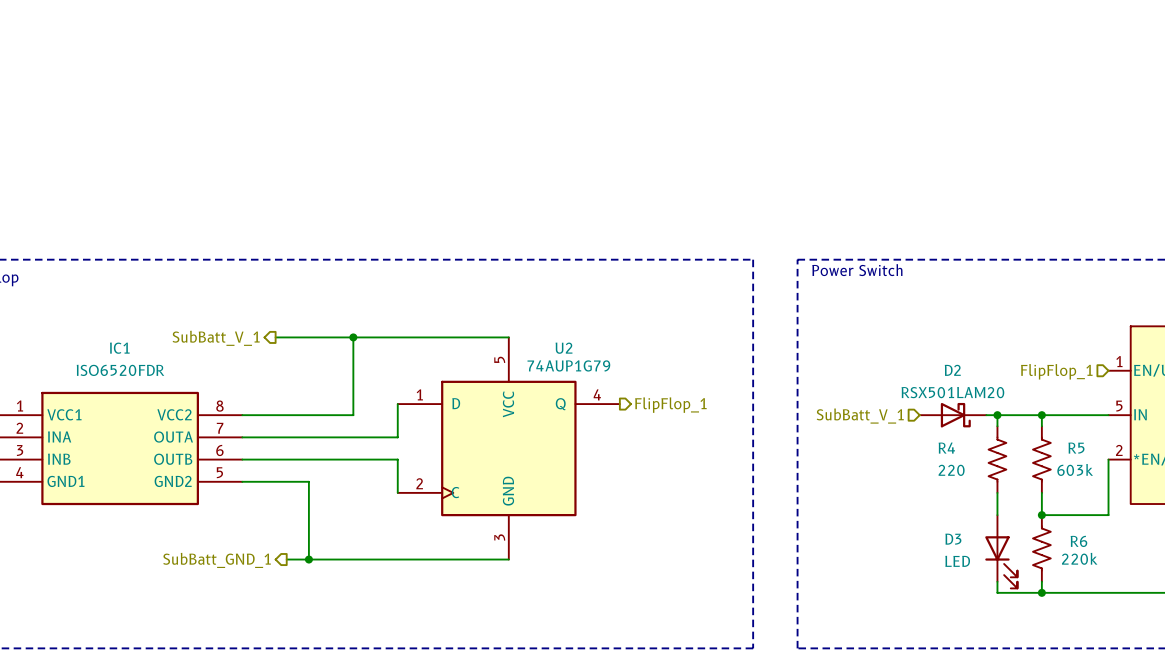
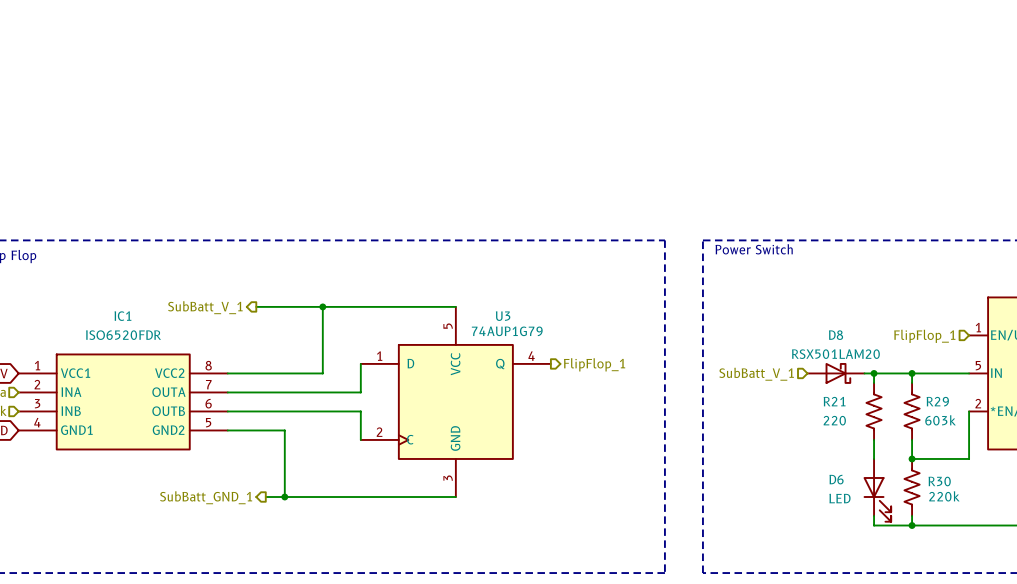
U2 name: U2 (564, 348) -> U3 (503, 316)
D2 name: D2 (952, 370) -> D8 (836, 335)
R4 name: R4 (946, 448) -> R21 (834, 401)
R5 name: R5 (1076, 448) -> R29 (937, 401)
D3 name: D3 (953, 539) -> D6 (836, 479)
R6 name: R6 (1078, 541) -> R30 (939, 481)

